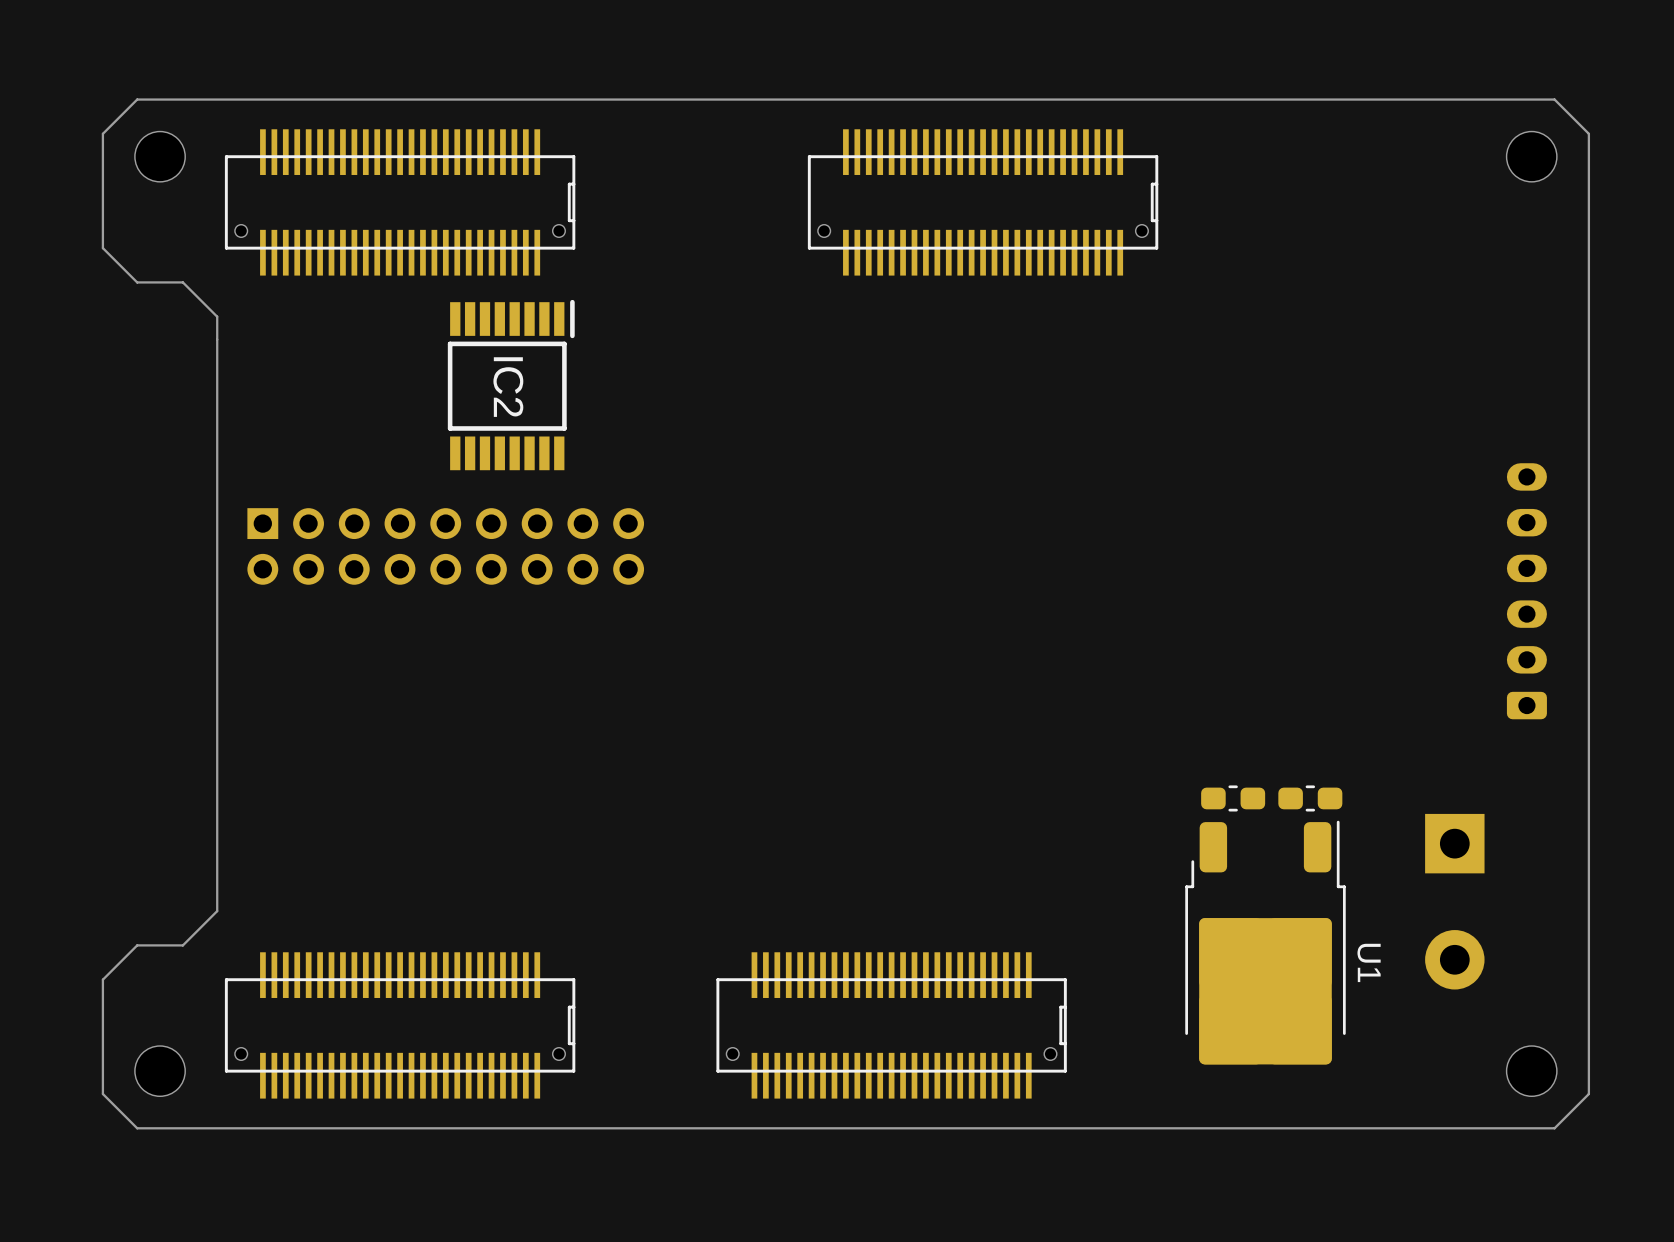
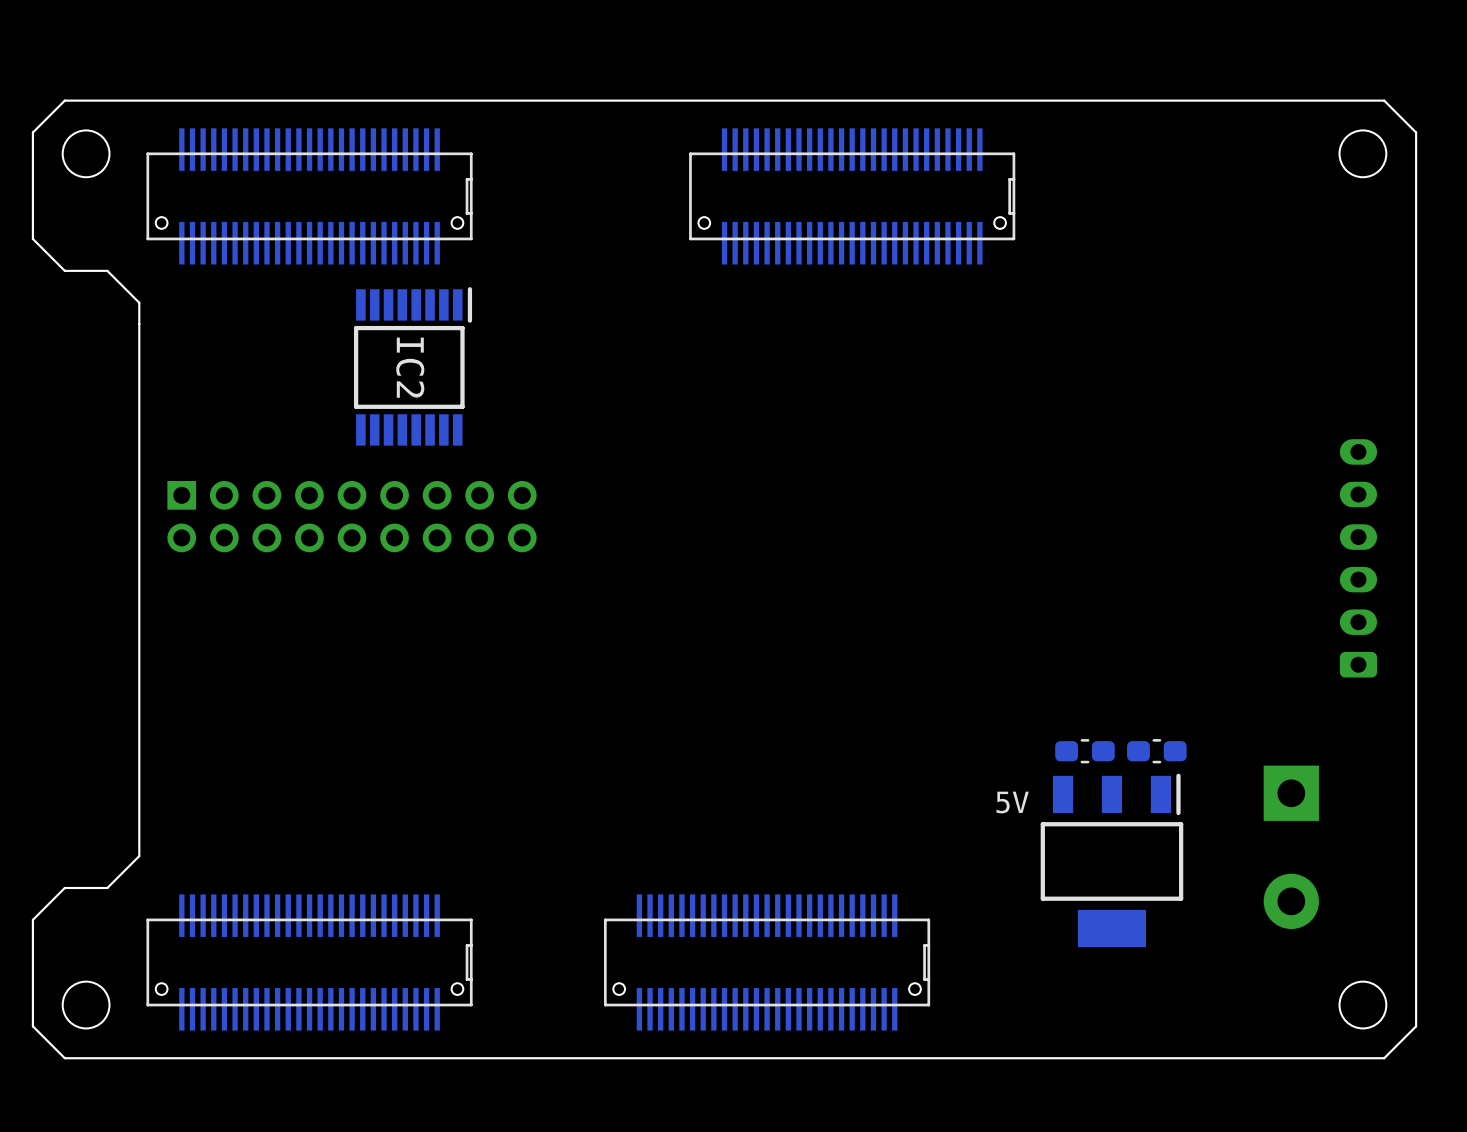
part: none -> (1111, 860)
U1: (1265, 942) -> none

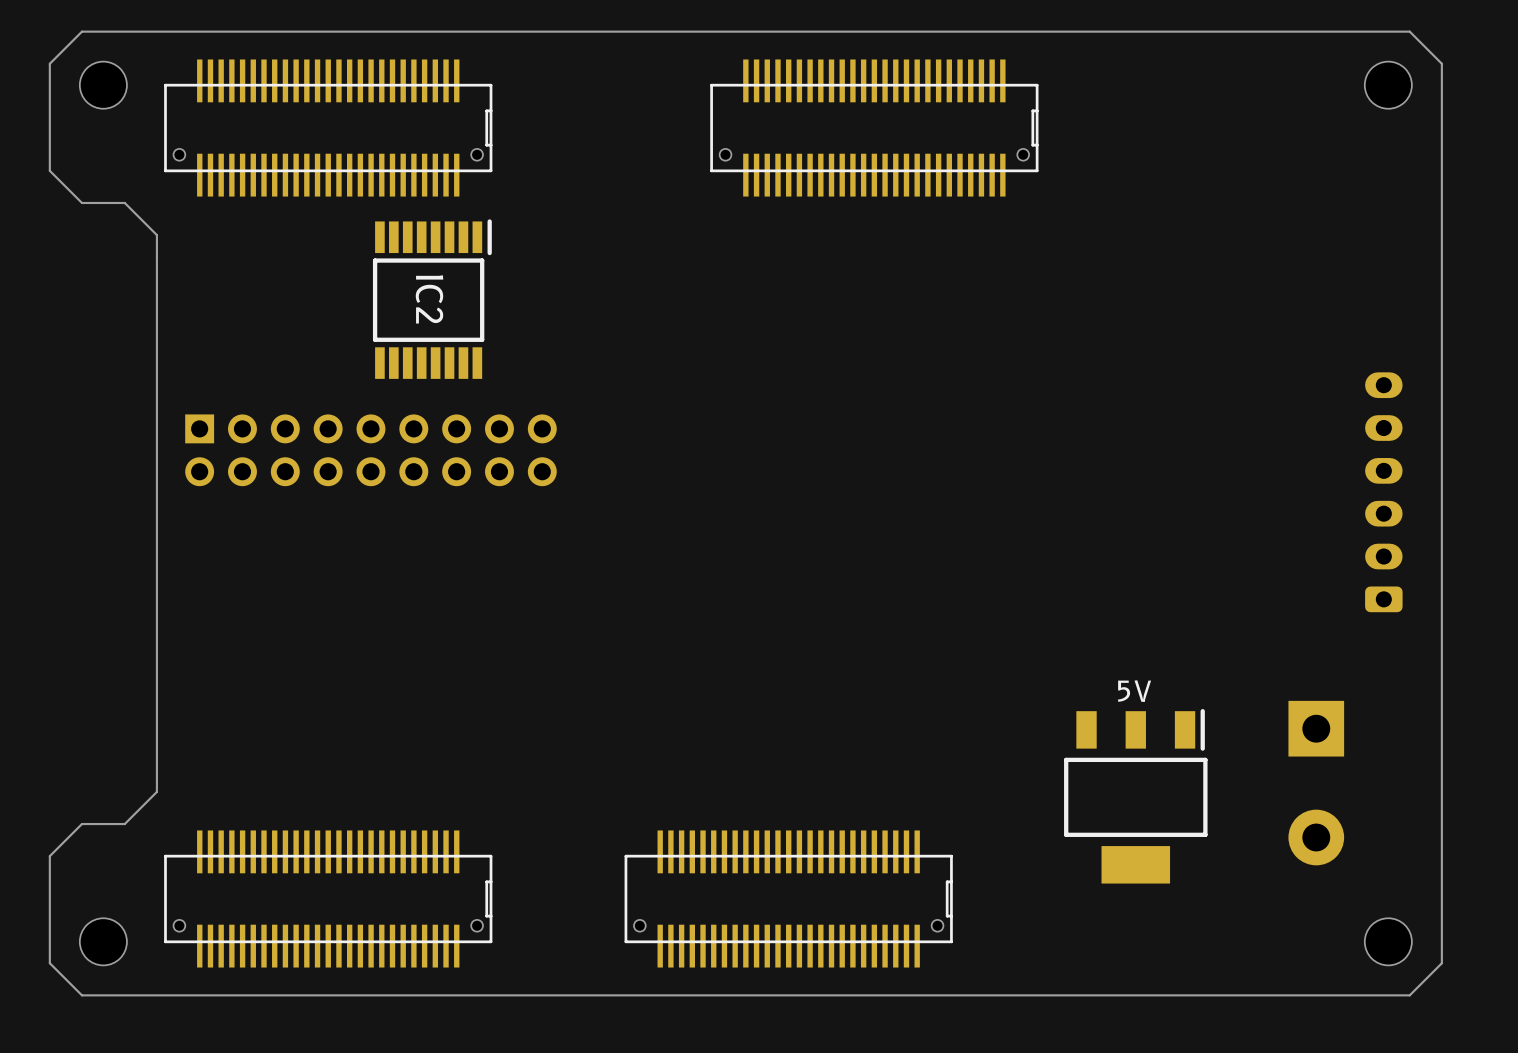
part: (1084, 751) -> none
part: (1156, 751) -> none
part text position: 5V (1012, 802) -> 5V (1134, 691)

